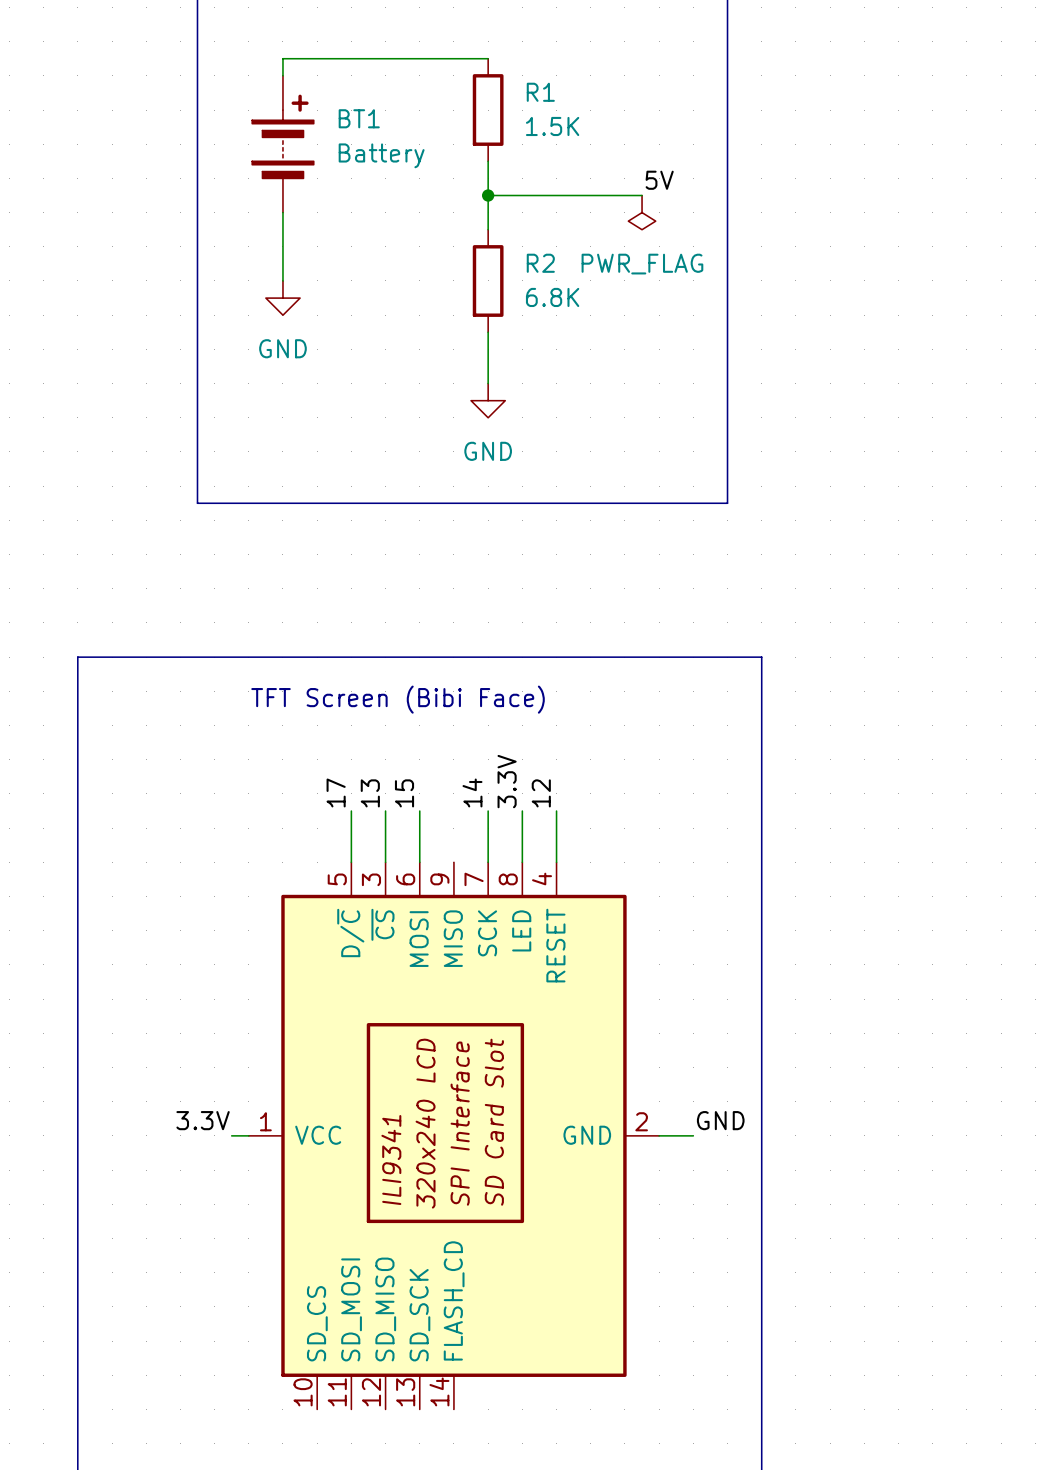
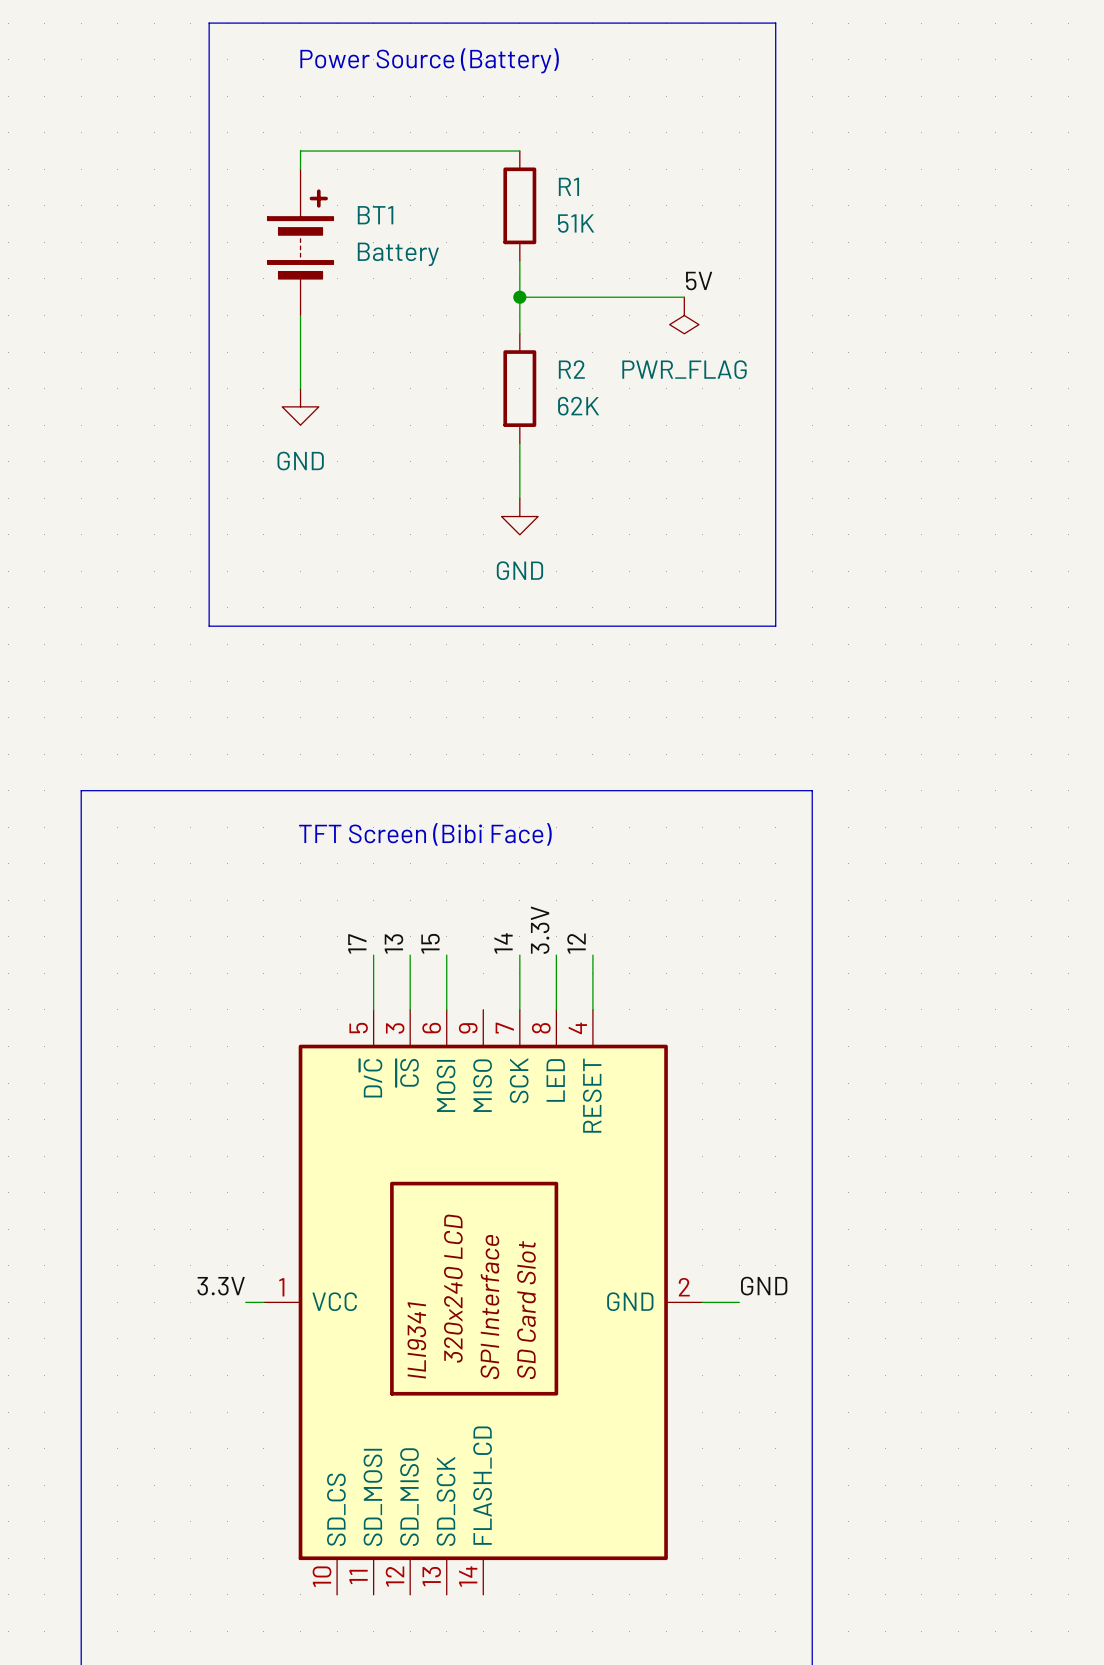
R1 value: 1.5K (552, 126) -> 51K (576, 223)
R2 value: 6.8K (552, 297) -> 62K (578, 406)

